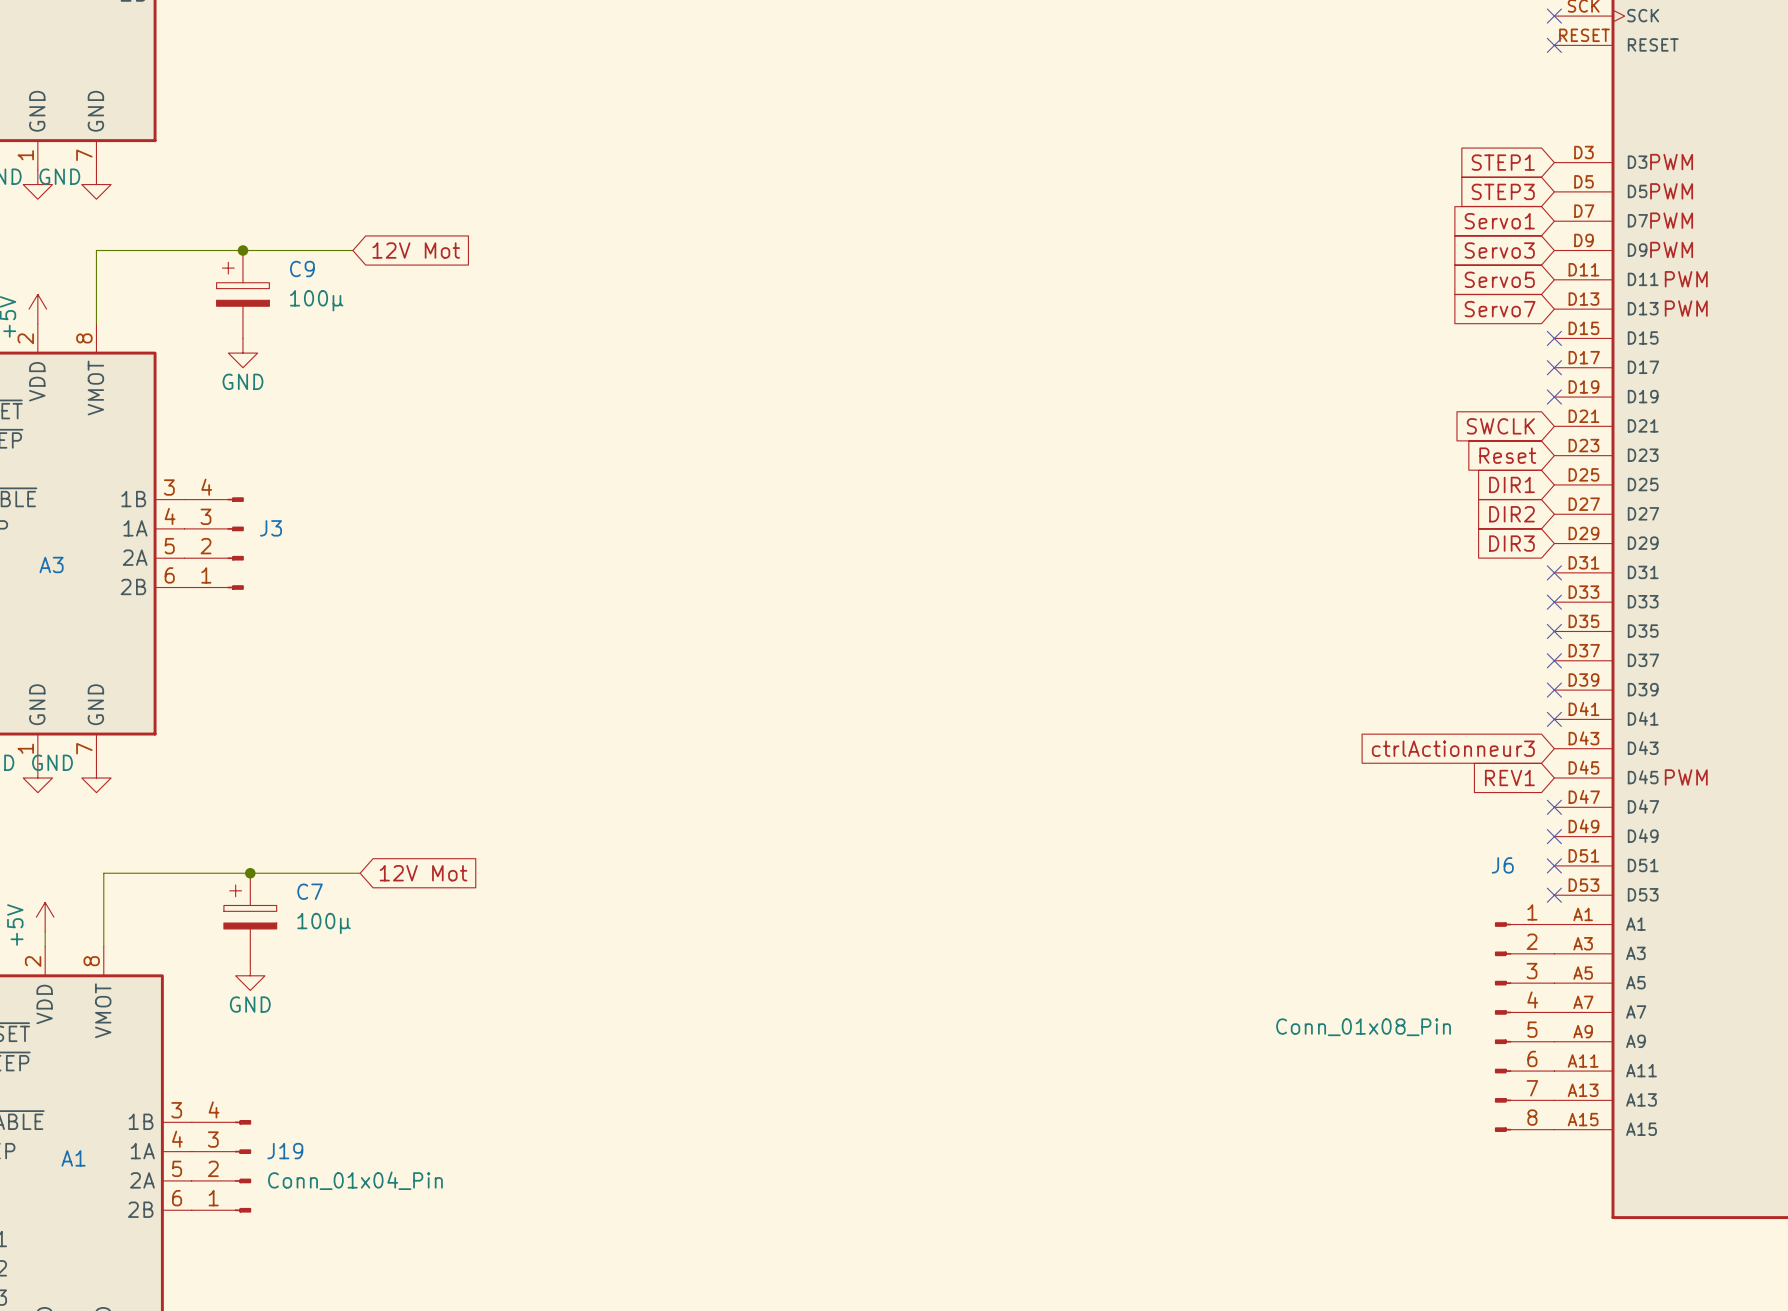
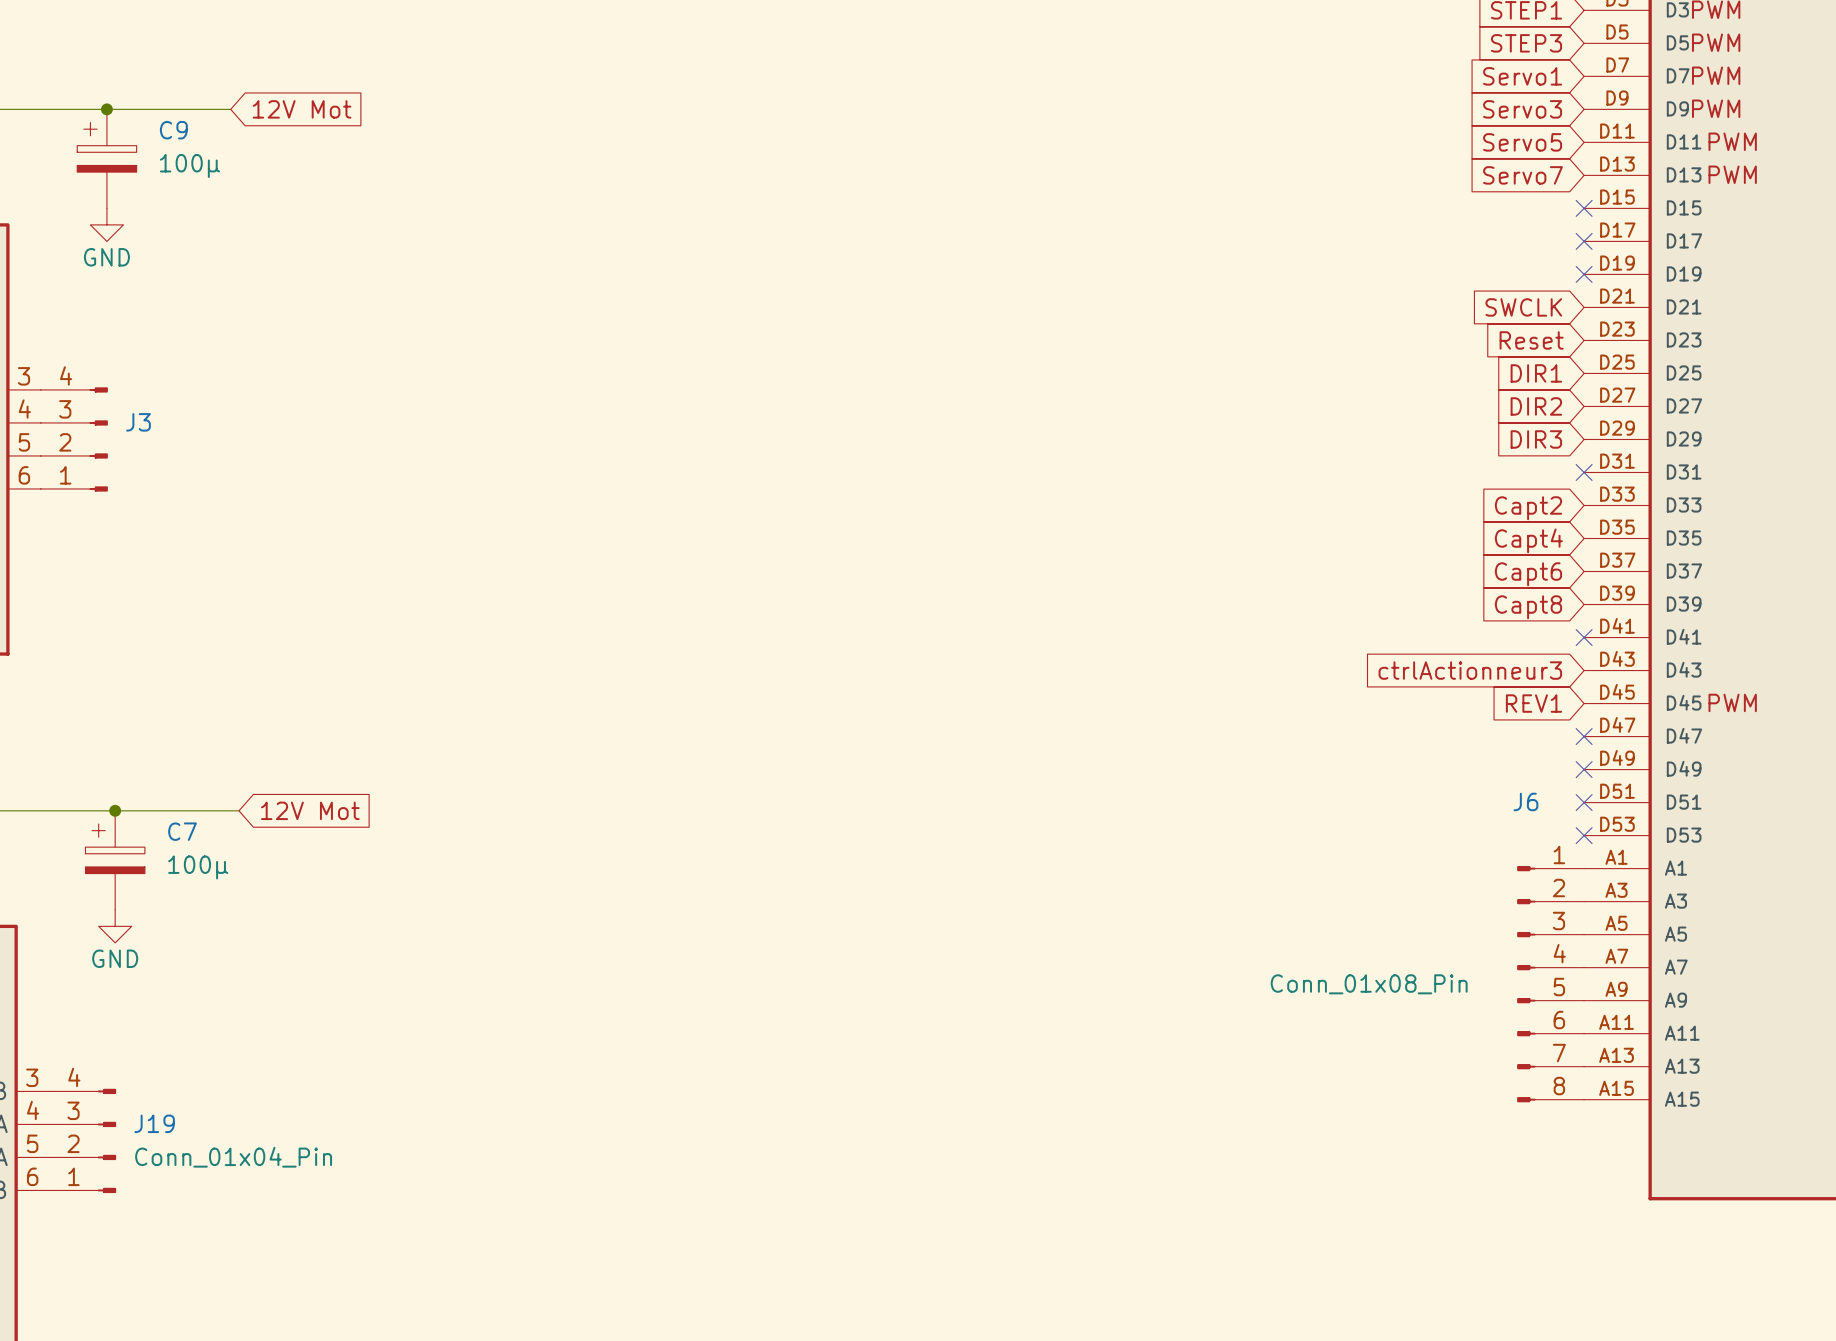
no-connect mark: (1554, 602) -> none
global label: none -> Capt2 (1528, 508)
no-connect mark: (1554, 631) -> none
global label: none -> Capt4 (1528, 540)
no-connect mark: (1554, 660) -> none
global label: none -> Capt6 (1528, 574)
no-connect mark: (1554, 690) -> none
global label: none -> Capt8 (1528, 607)

